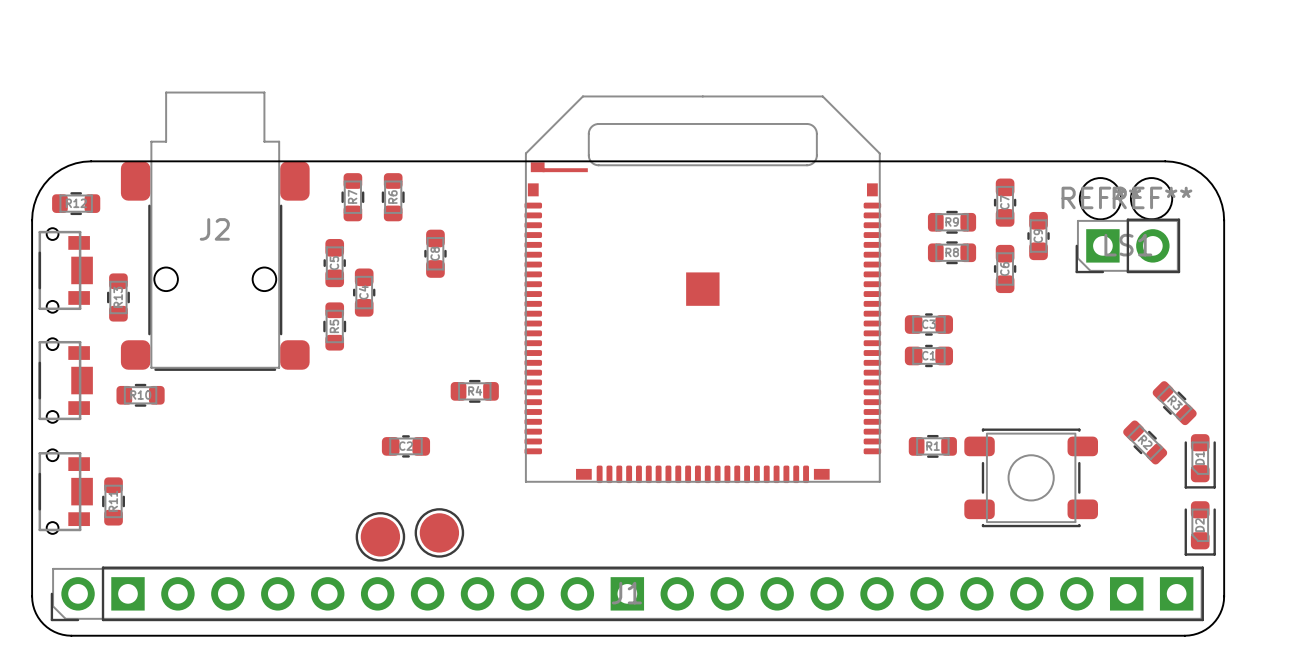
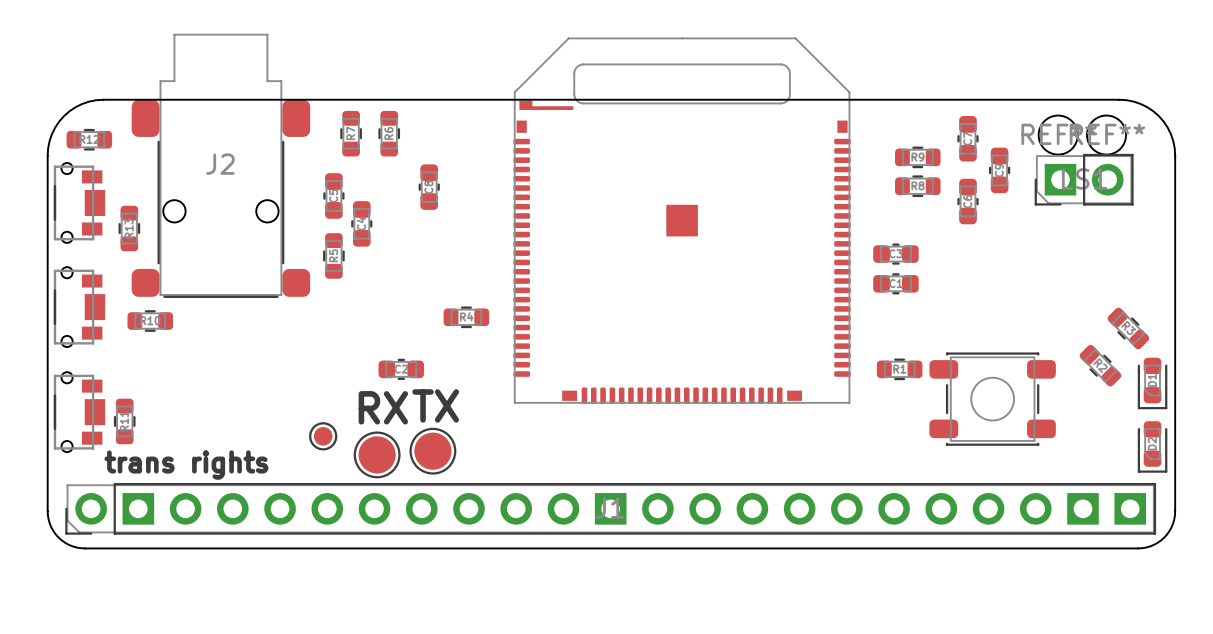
text: none -> TX (435, 405)
text: none -> RX (383, 407)
part: none -> (323, 436)
text: none -> trans rights (186, 465)

